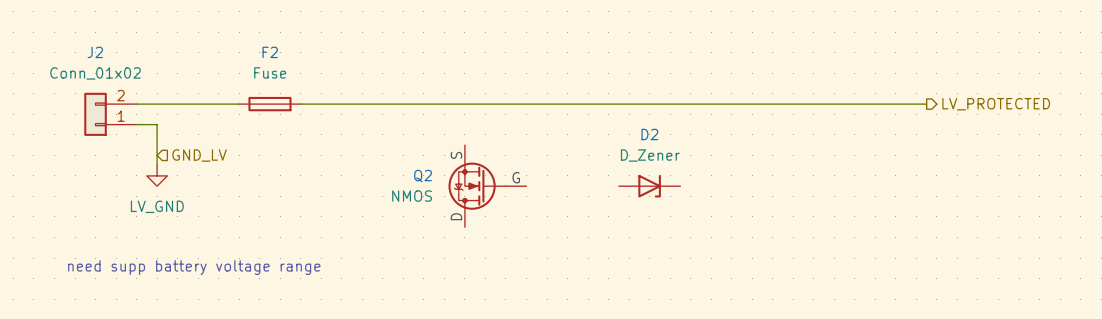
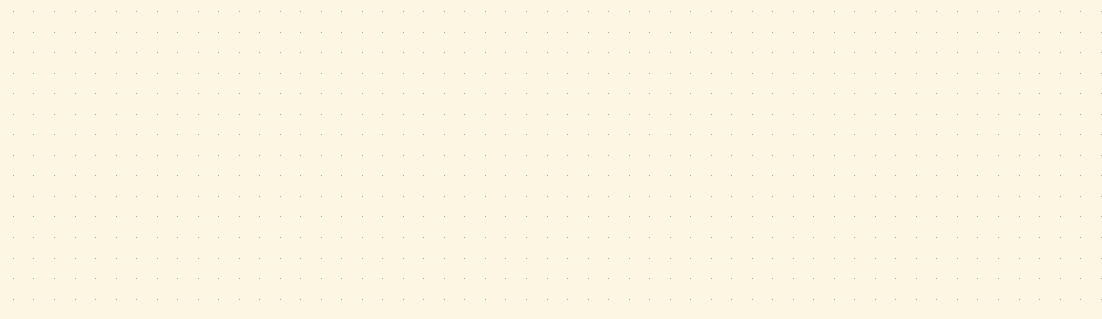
wire: (136, 104) (239, 104) -> none
F2: Fuse (269, 104) -> none
wire: (300, 104) (926, 104) -> none
hierarchical label: LV_PROTECTED (996, 104) -> none
J2: Conn_01x02 (110, 114) -> none
wire: (136, 124) (157, 124) (157, 165) -> none
hierarchical label: GND_LV (199, 155) -> none
power symbol: LV_GND (157, 175) -> none
Q2: NMOS (487, 186) -> none
D2: D_Zener (649, 186) -> none
text: need supp battery voltage range (194, 267) -> none

